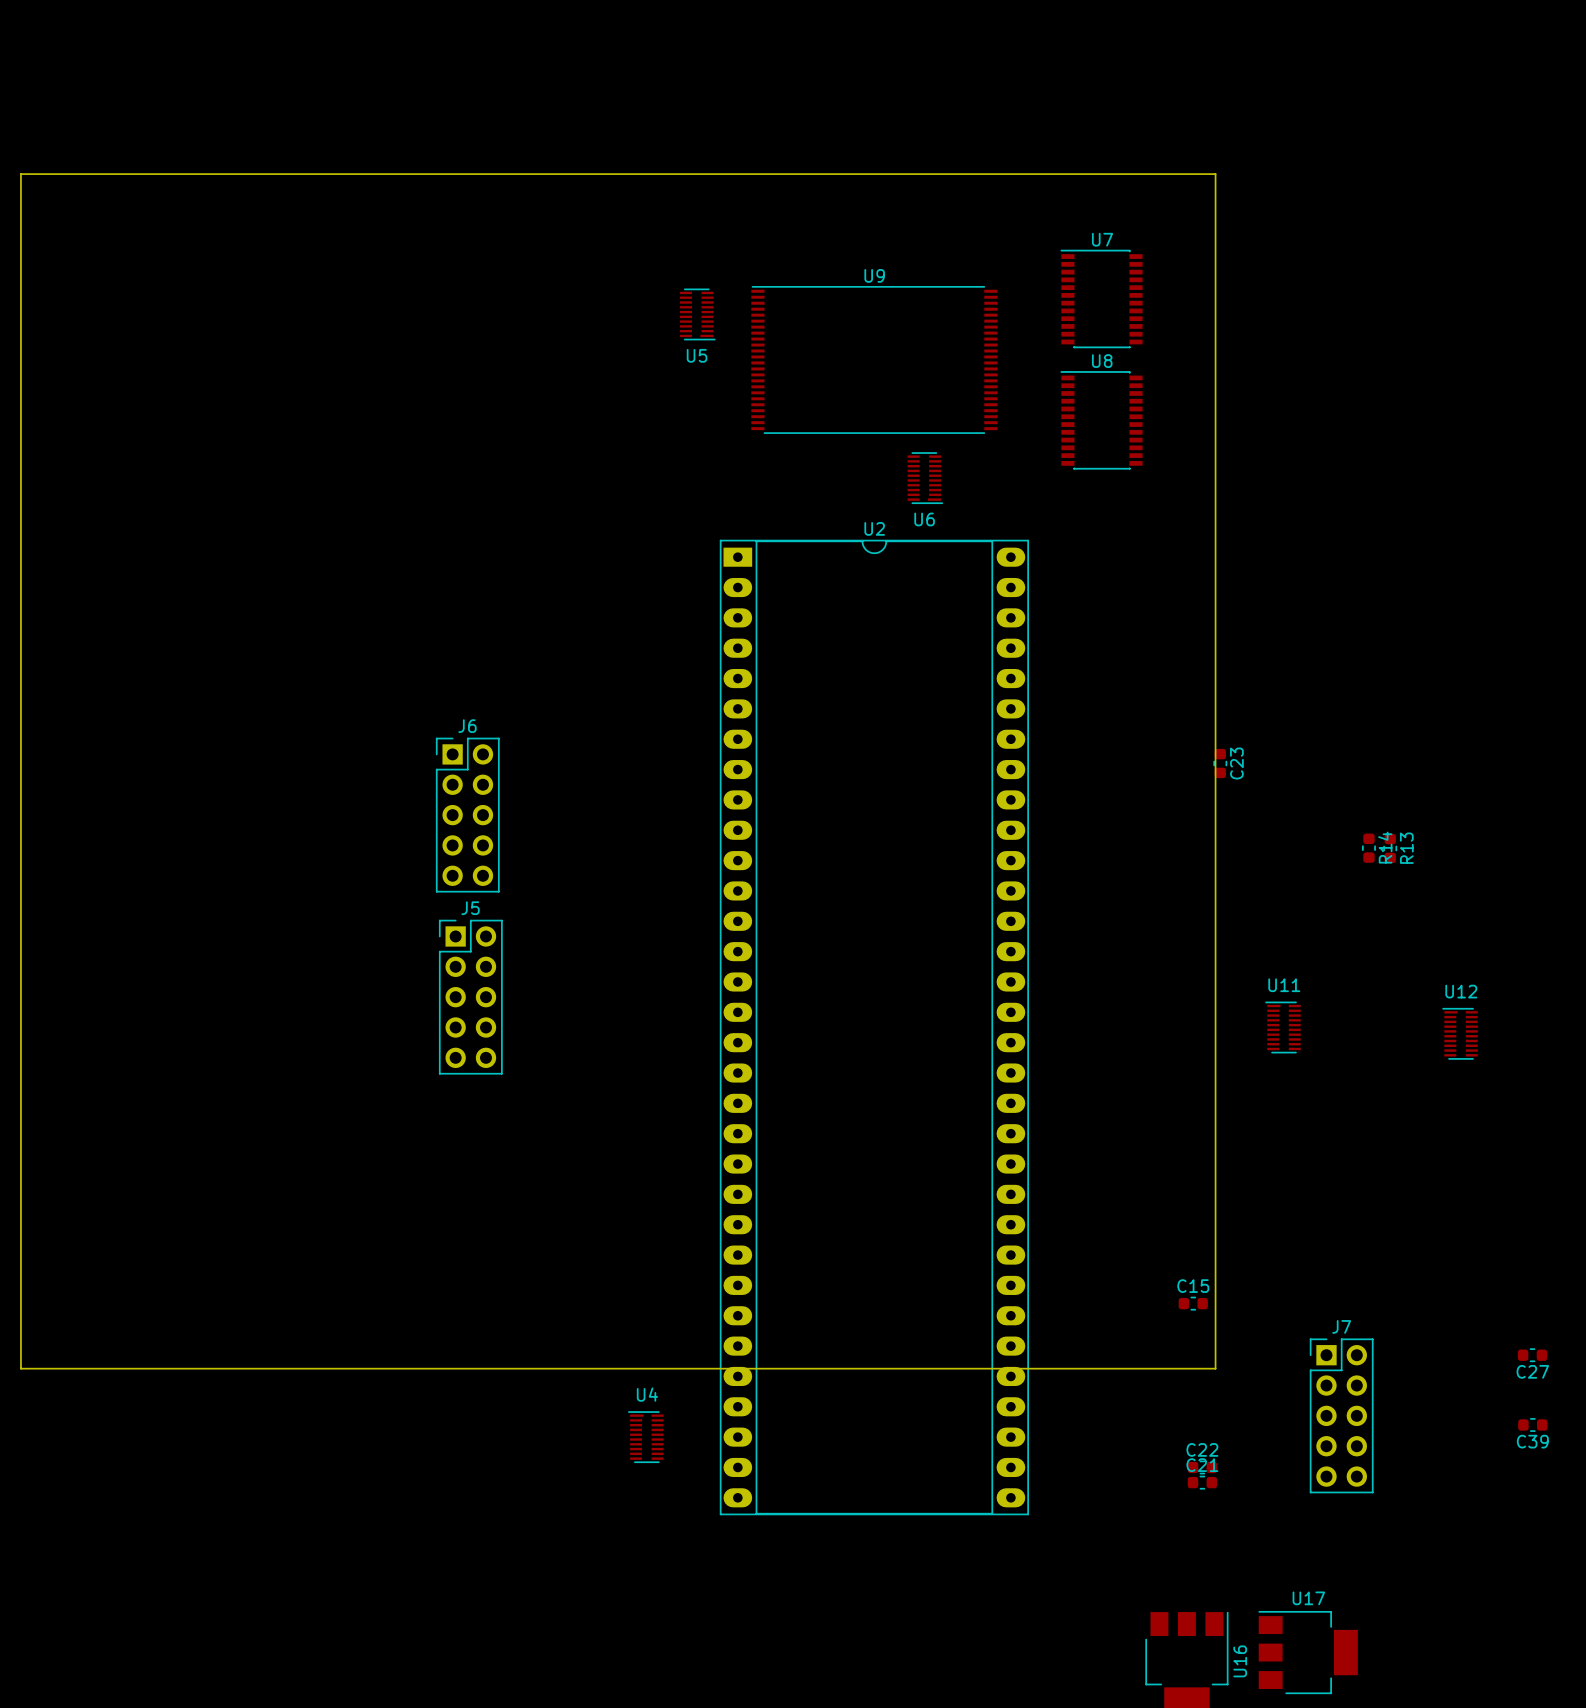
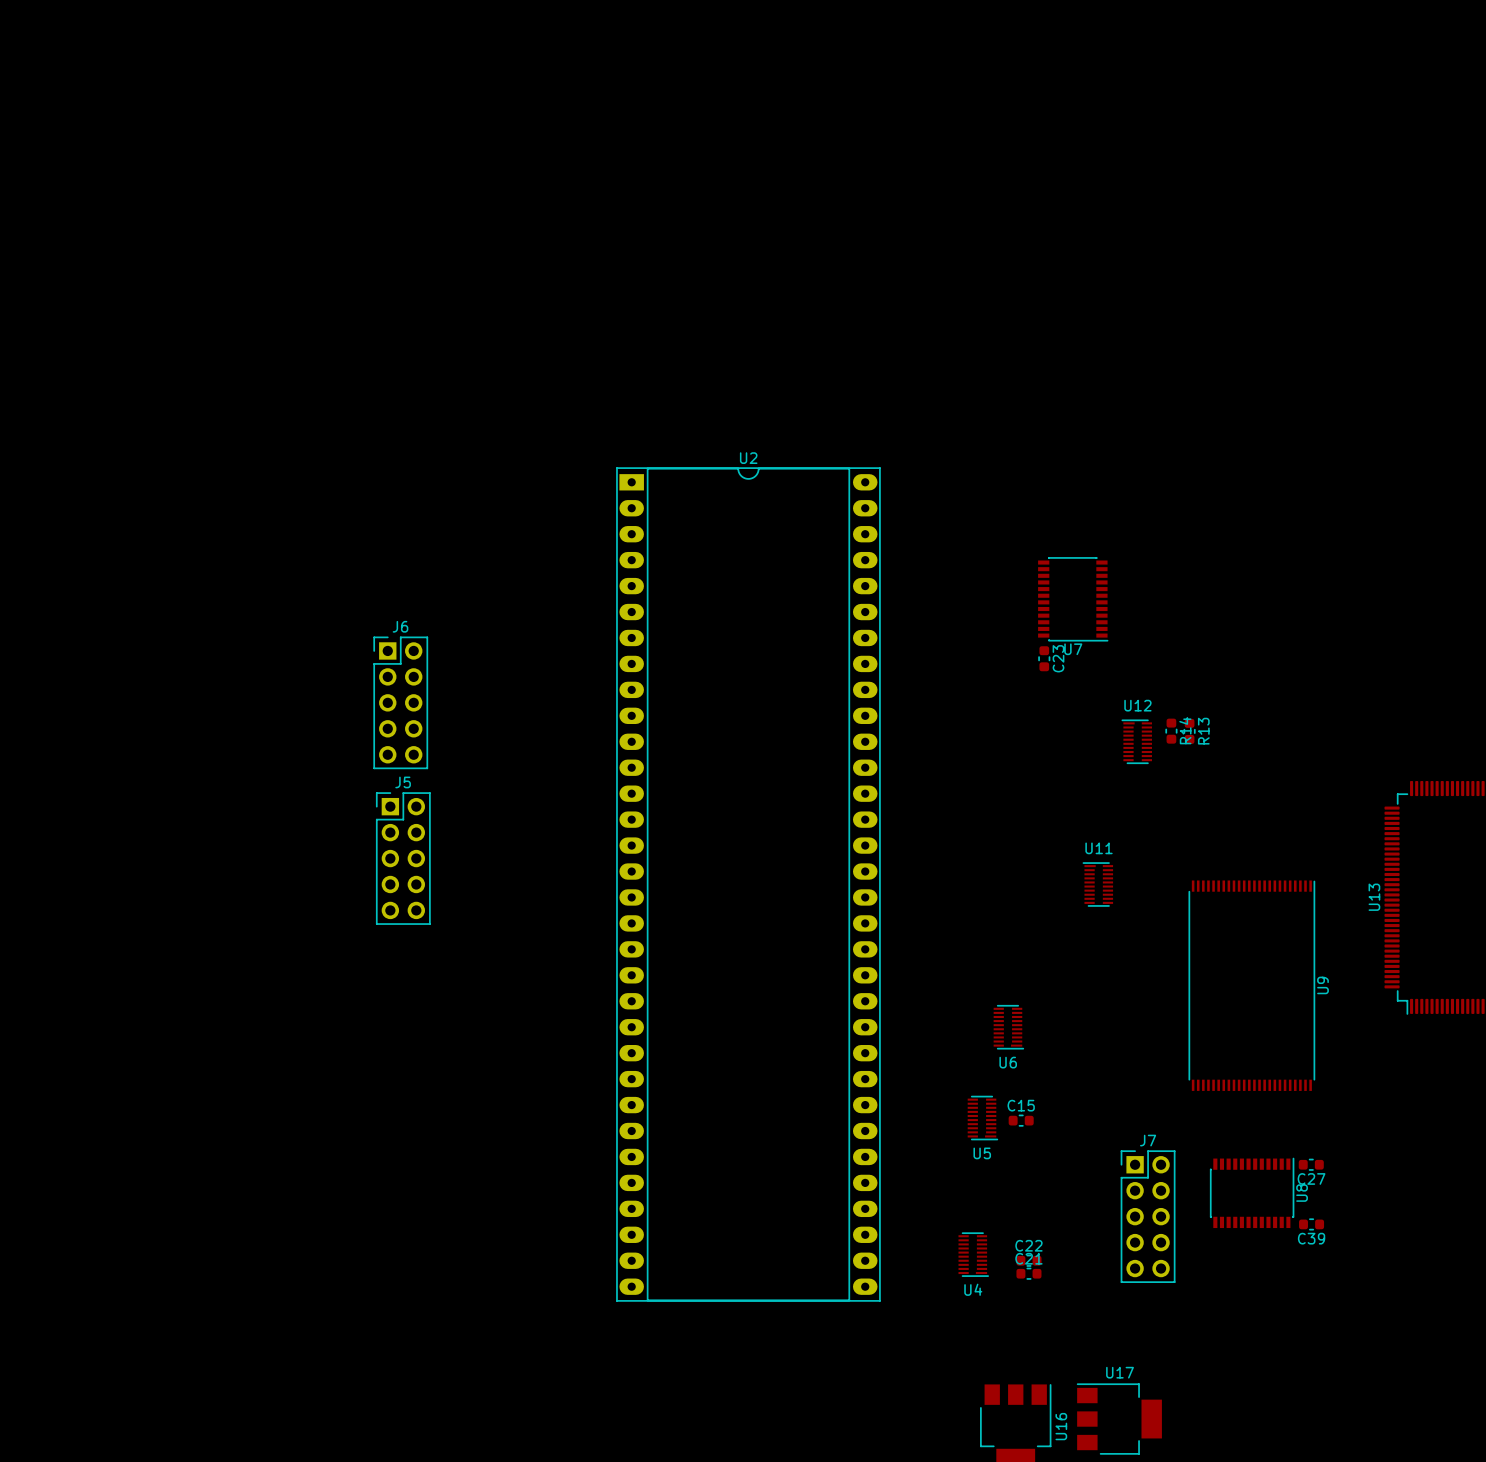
board edge: (20, 174) (20, 1368) (1215, 1368) (1215, 174) (20, 174) -> none
U7 rotation: 0° (1101, 298) -> 180° (1073, 599)
U7 position: (1101, 298) -> (1073, 599)
U5 position: (697, 314) -> (982, 1118)
U9 rotation: 0° (874, 360) -> 90° clockwise (1251, 985)
U9 position: (874, 360) -> (1251, 985)
U8 rotation: 0° (1101, 420) -> 90° clockwise (1252, 1192)
U8 position: (1101, 420) -> (1252, 1192)
U6 position: (925, 478) -> (1008, 1027)
U12 position: (1460, 1033) -> (1136, 741)
U4 rotation: 0° (645, 1437) -> 180° (973, 1254)
U4 position: (645, 1437) -> (973, 1254)

